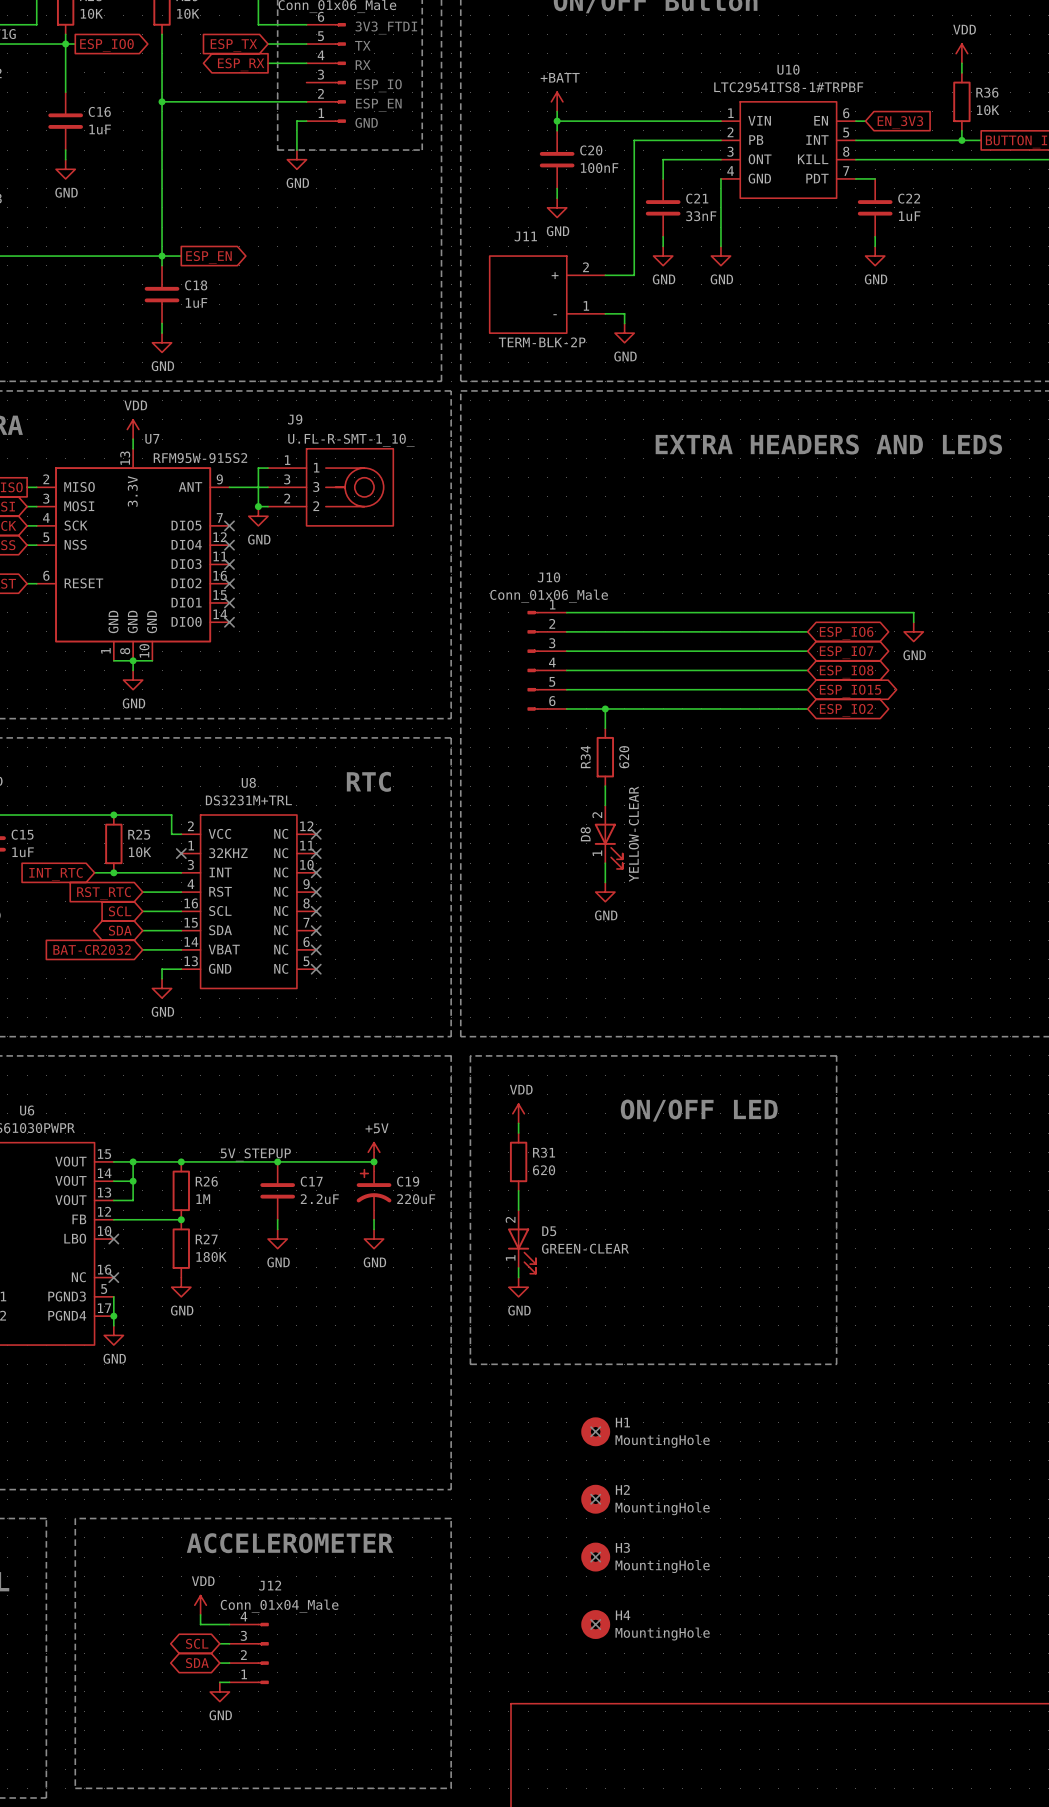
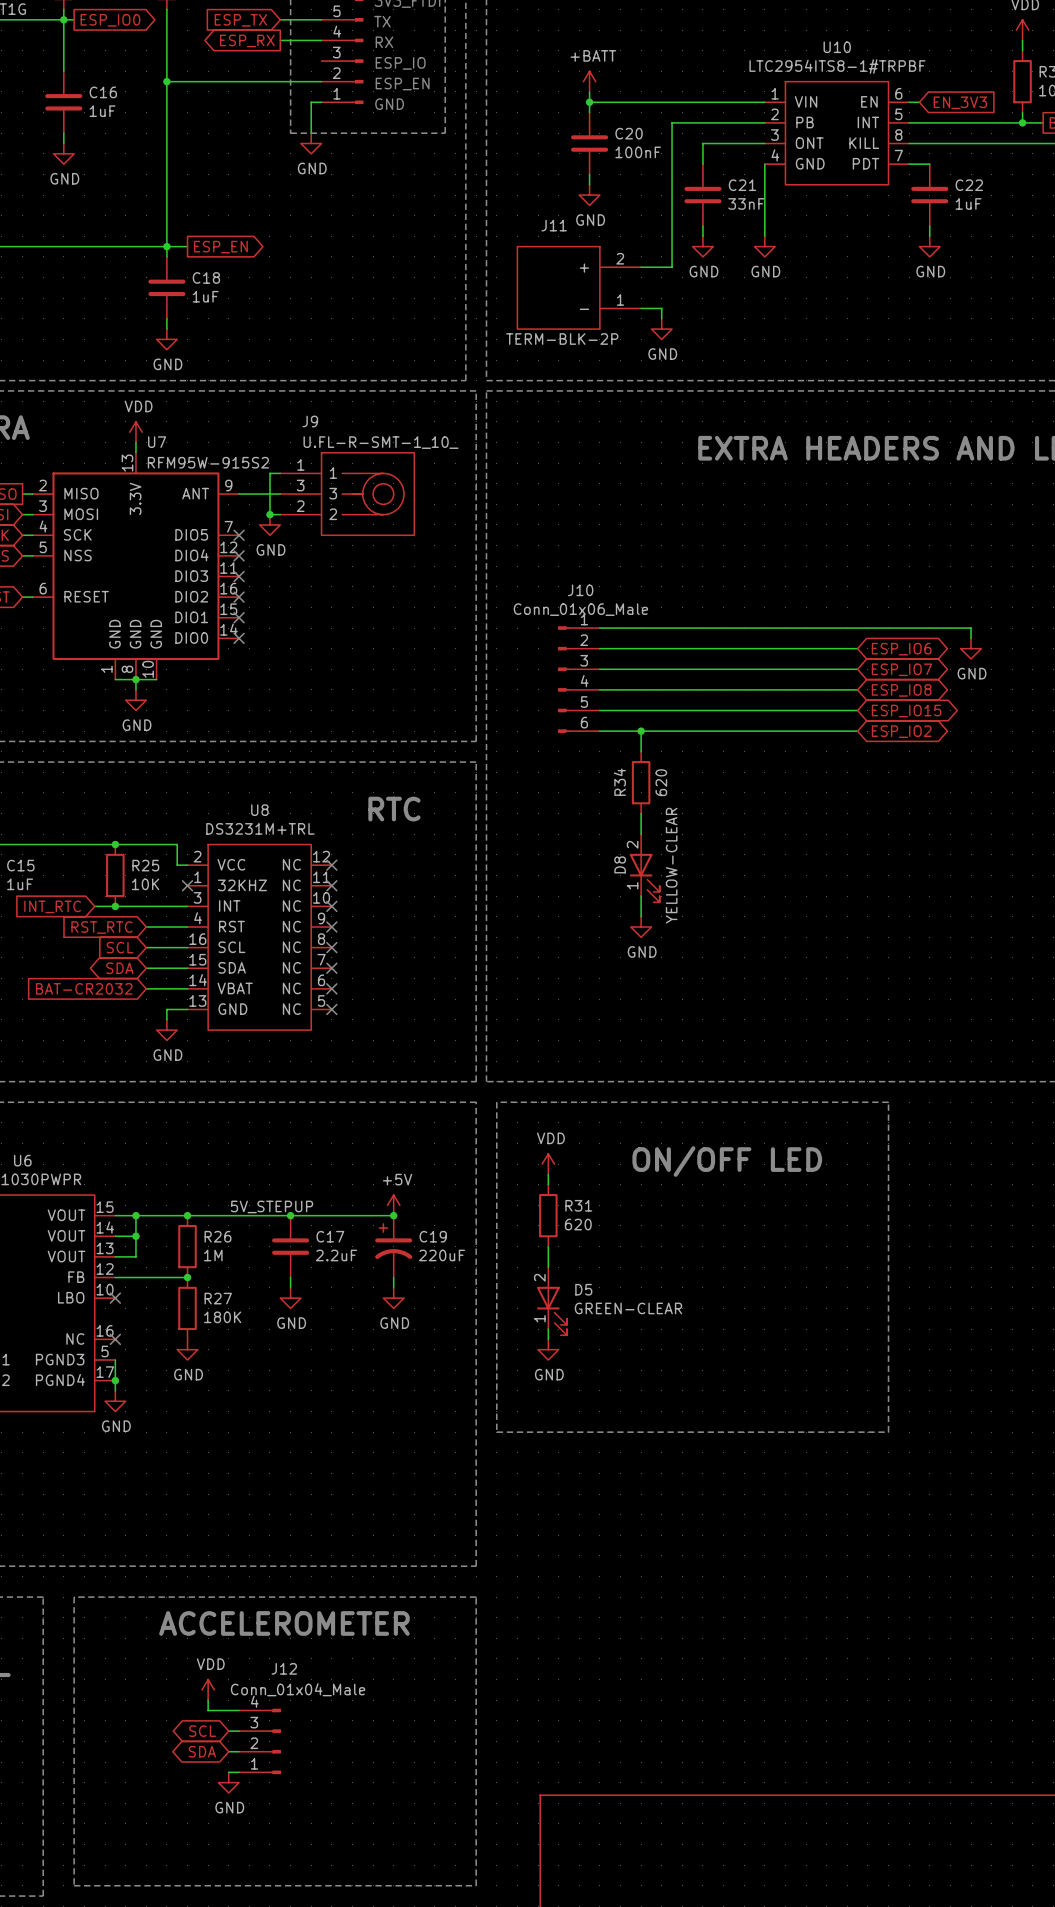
H1: MountingHole (595, 1431) -> none
no-connect mark: (595, 1431) -> none
H2: MountingHole (595, 1499) -> none
no-connect mark: (595, 1499) -> none
H3: MountingHole (595, 1557) -> none
no-connect mark: (595, 1557) -> none
H4: MountingHole (595, 1624) -> none
no-connect mark: (595, 1624) -> none

